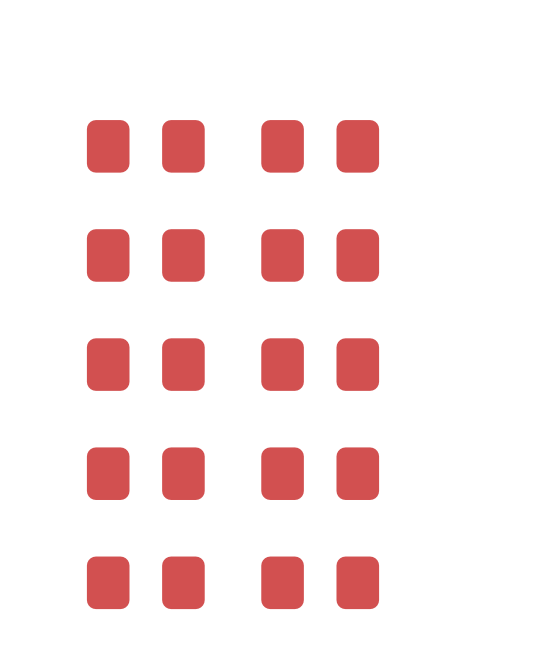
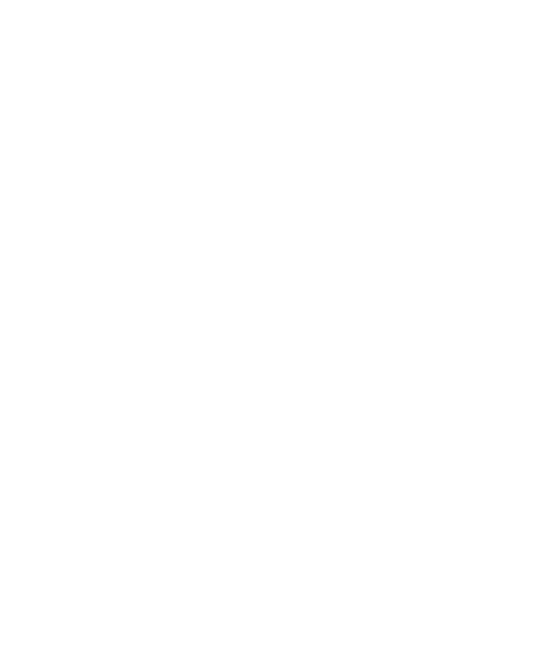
part: (145, 146) -> none
part: (320, 146) -> none
part: (145, 255) -> none
part: (320, 255) -> none
part: (145, 364) -> none
part: (320, 364) -> none
part: (145, 473) -> none
part: (320, 473) -> none
part: (145, 582) -> none
part: (320, 582) -> none

